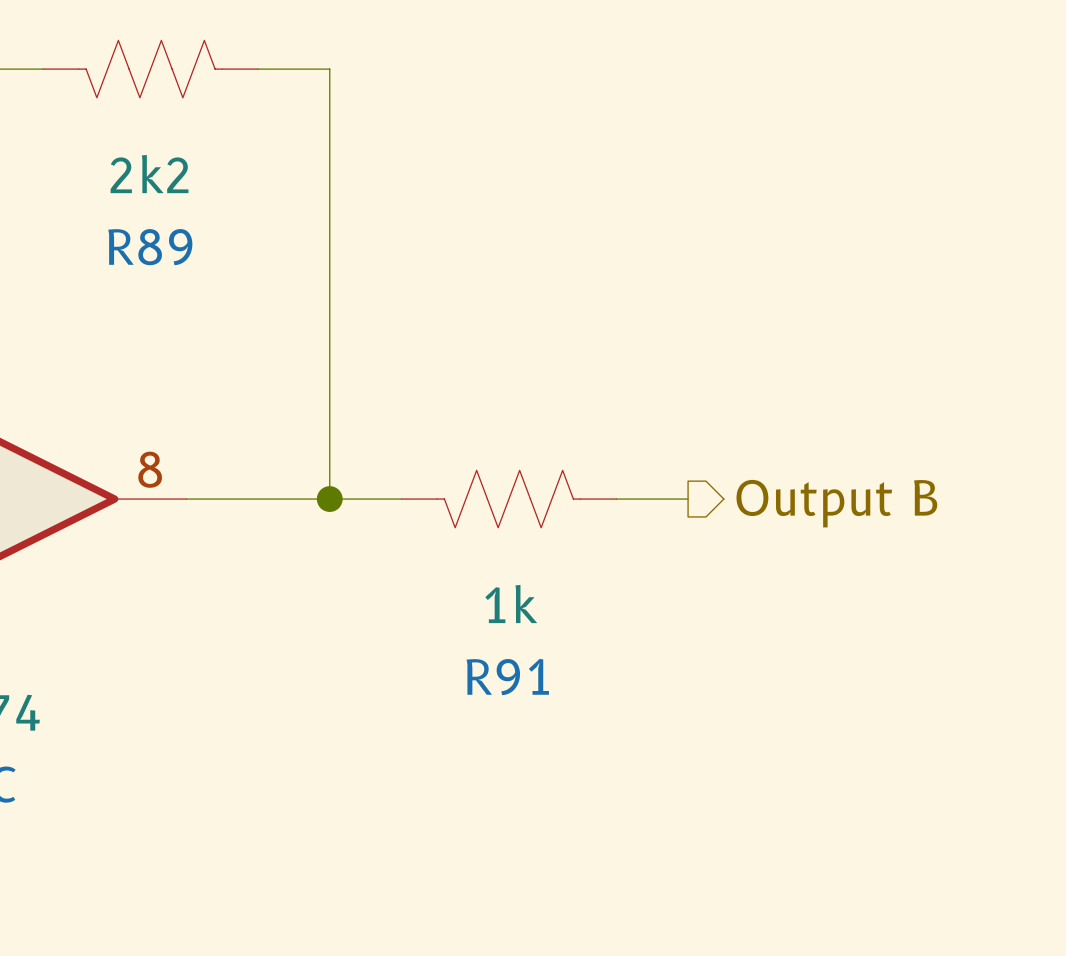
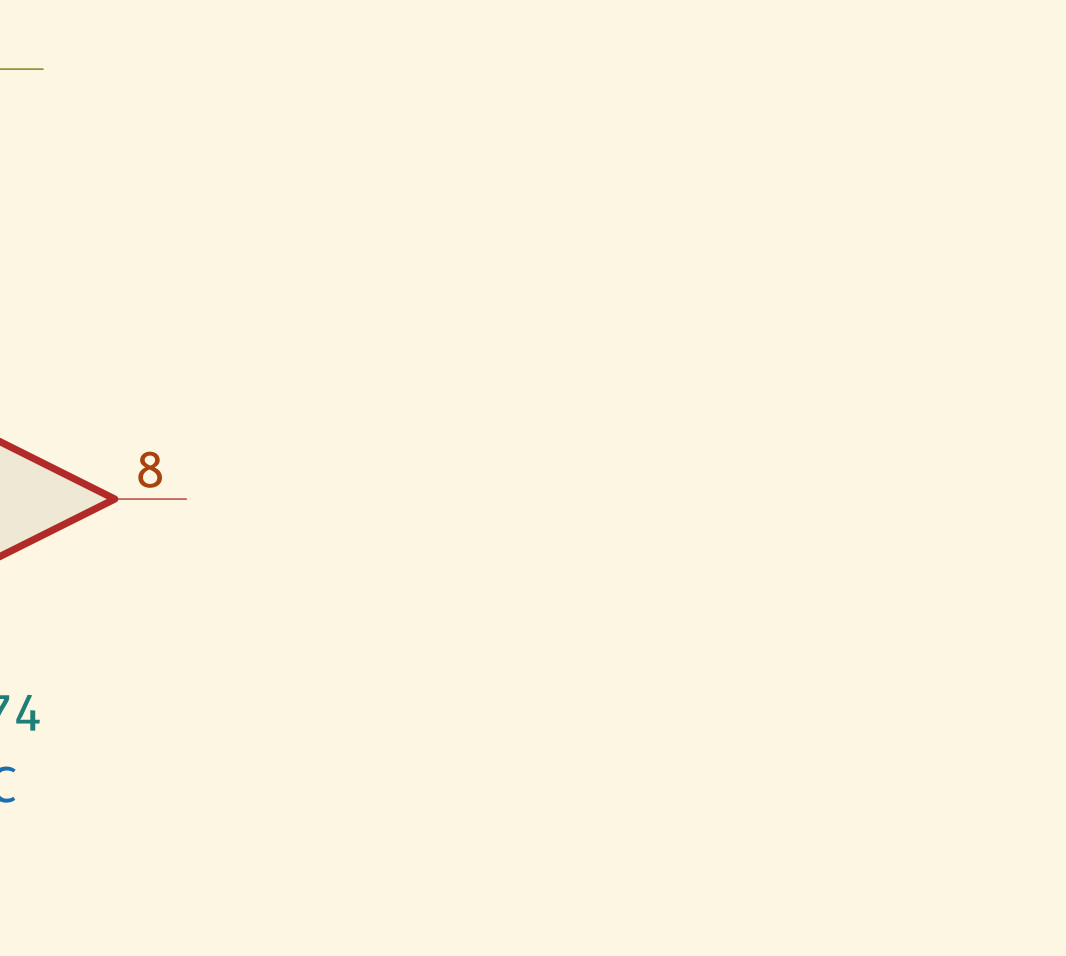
R89: 2k2 (150, 69) -> none
wire: (258, 69) (329, 69) (329, 499) -> none
wire: (186, 499) (401, 499) -> none
junction: (329, 499) -> none
R91: 1k (508, 499) -> none
wire: (616, 499) (688, 499) -> none
hierarchical label: Output B (836, 503) -> none

